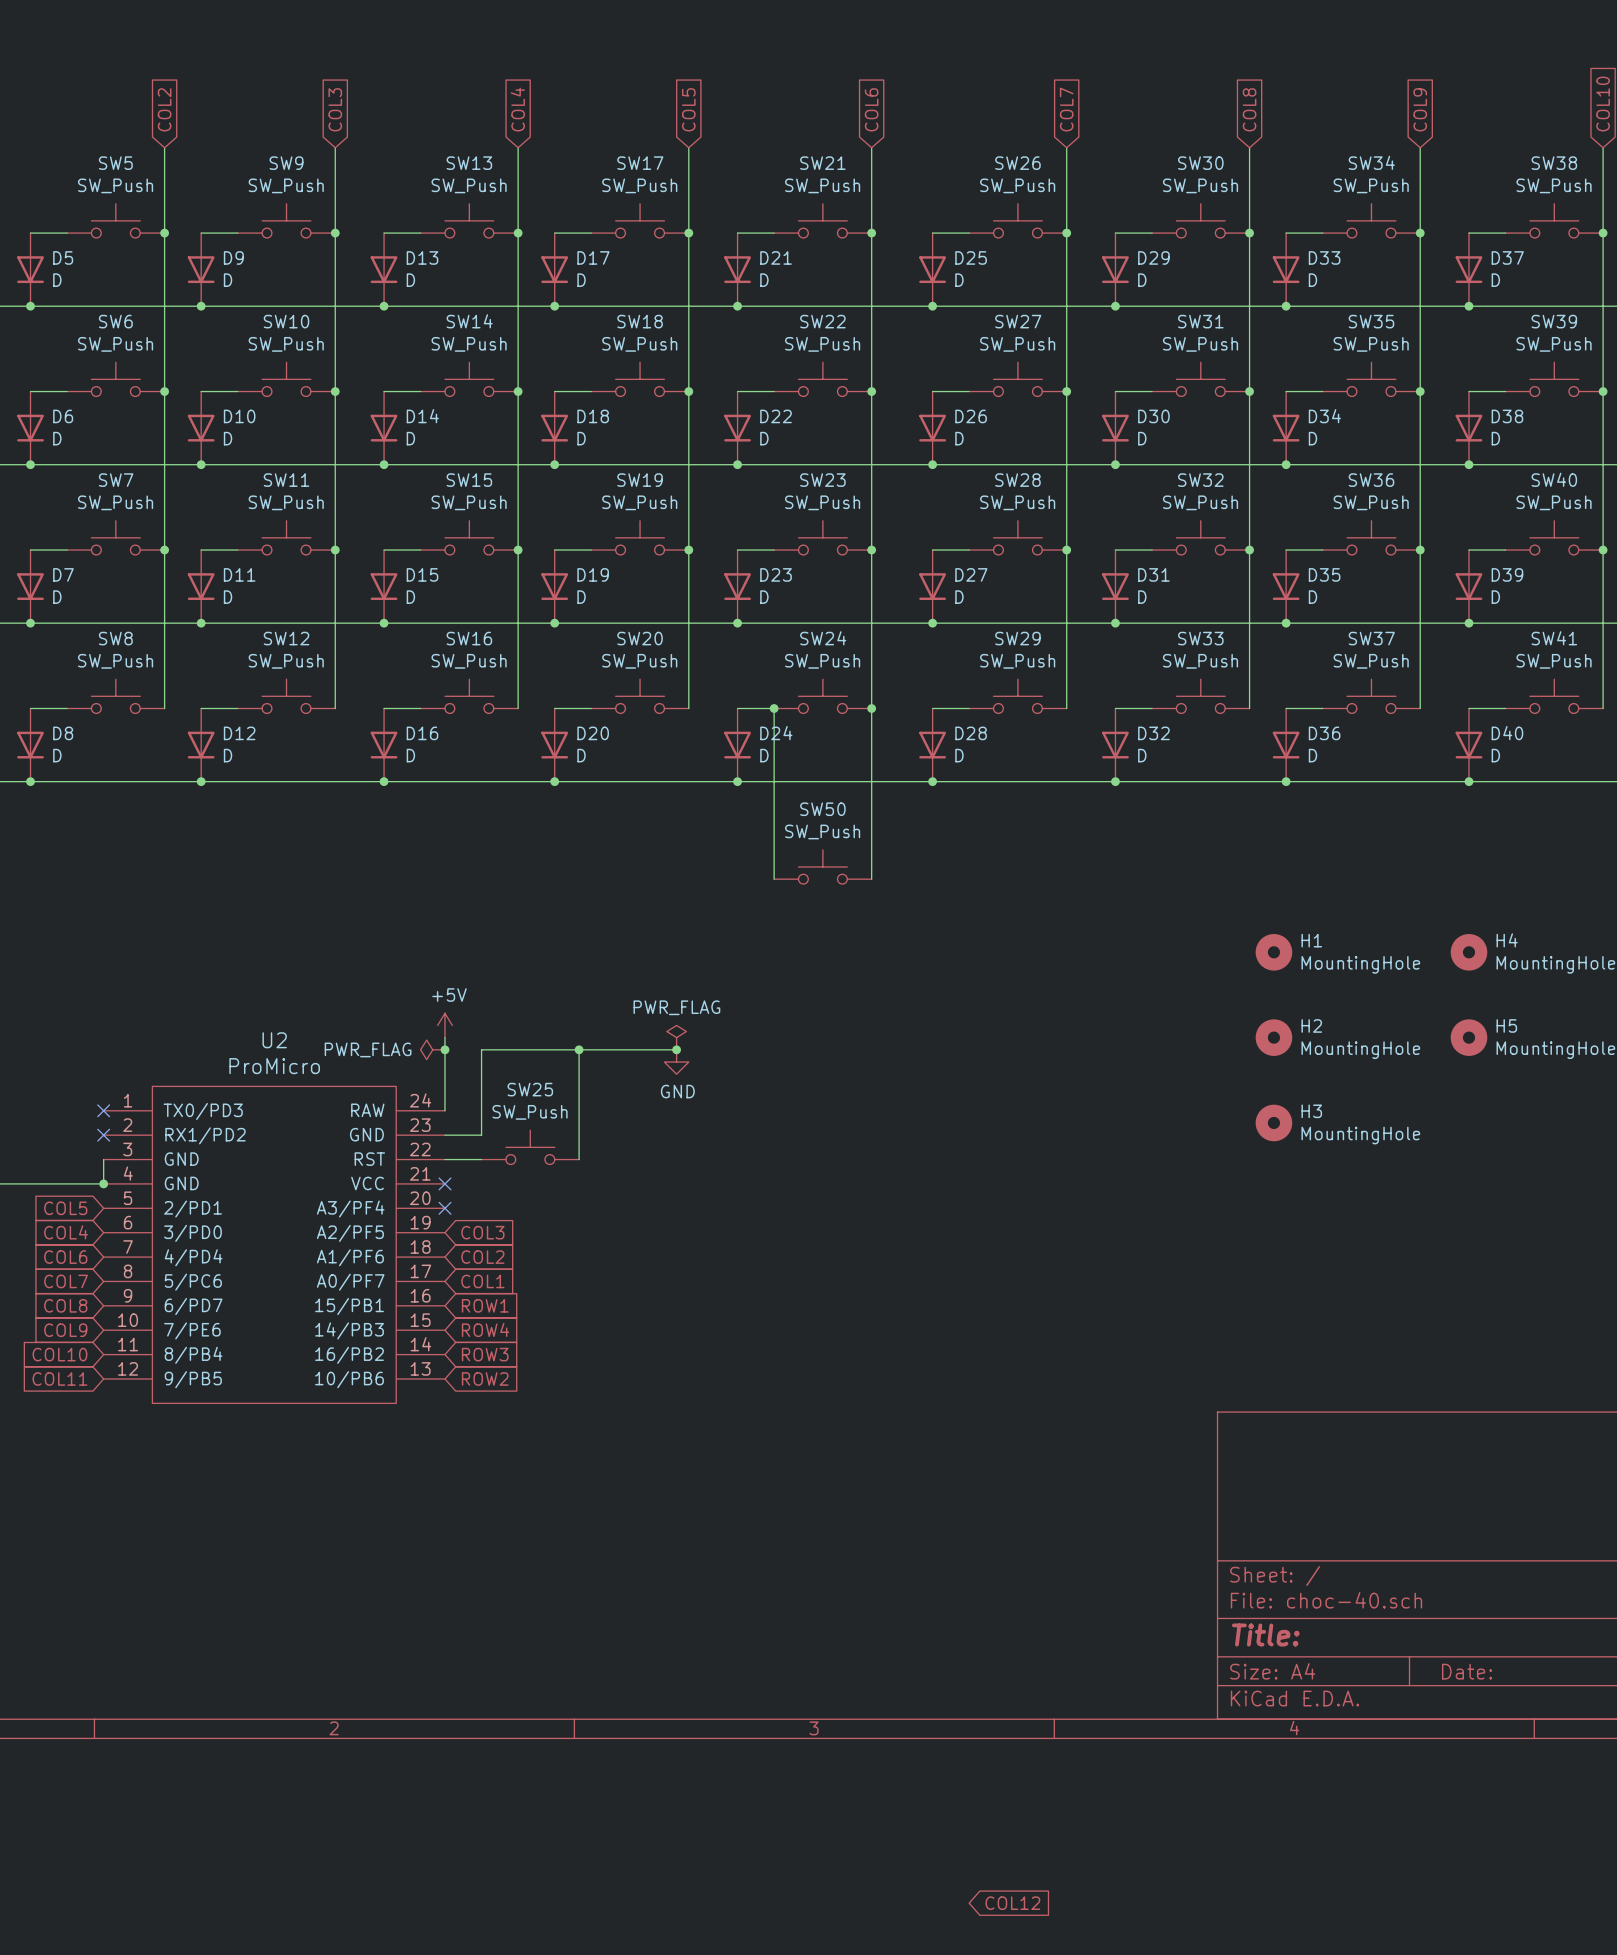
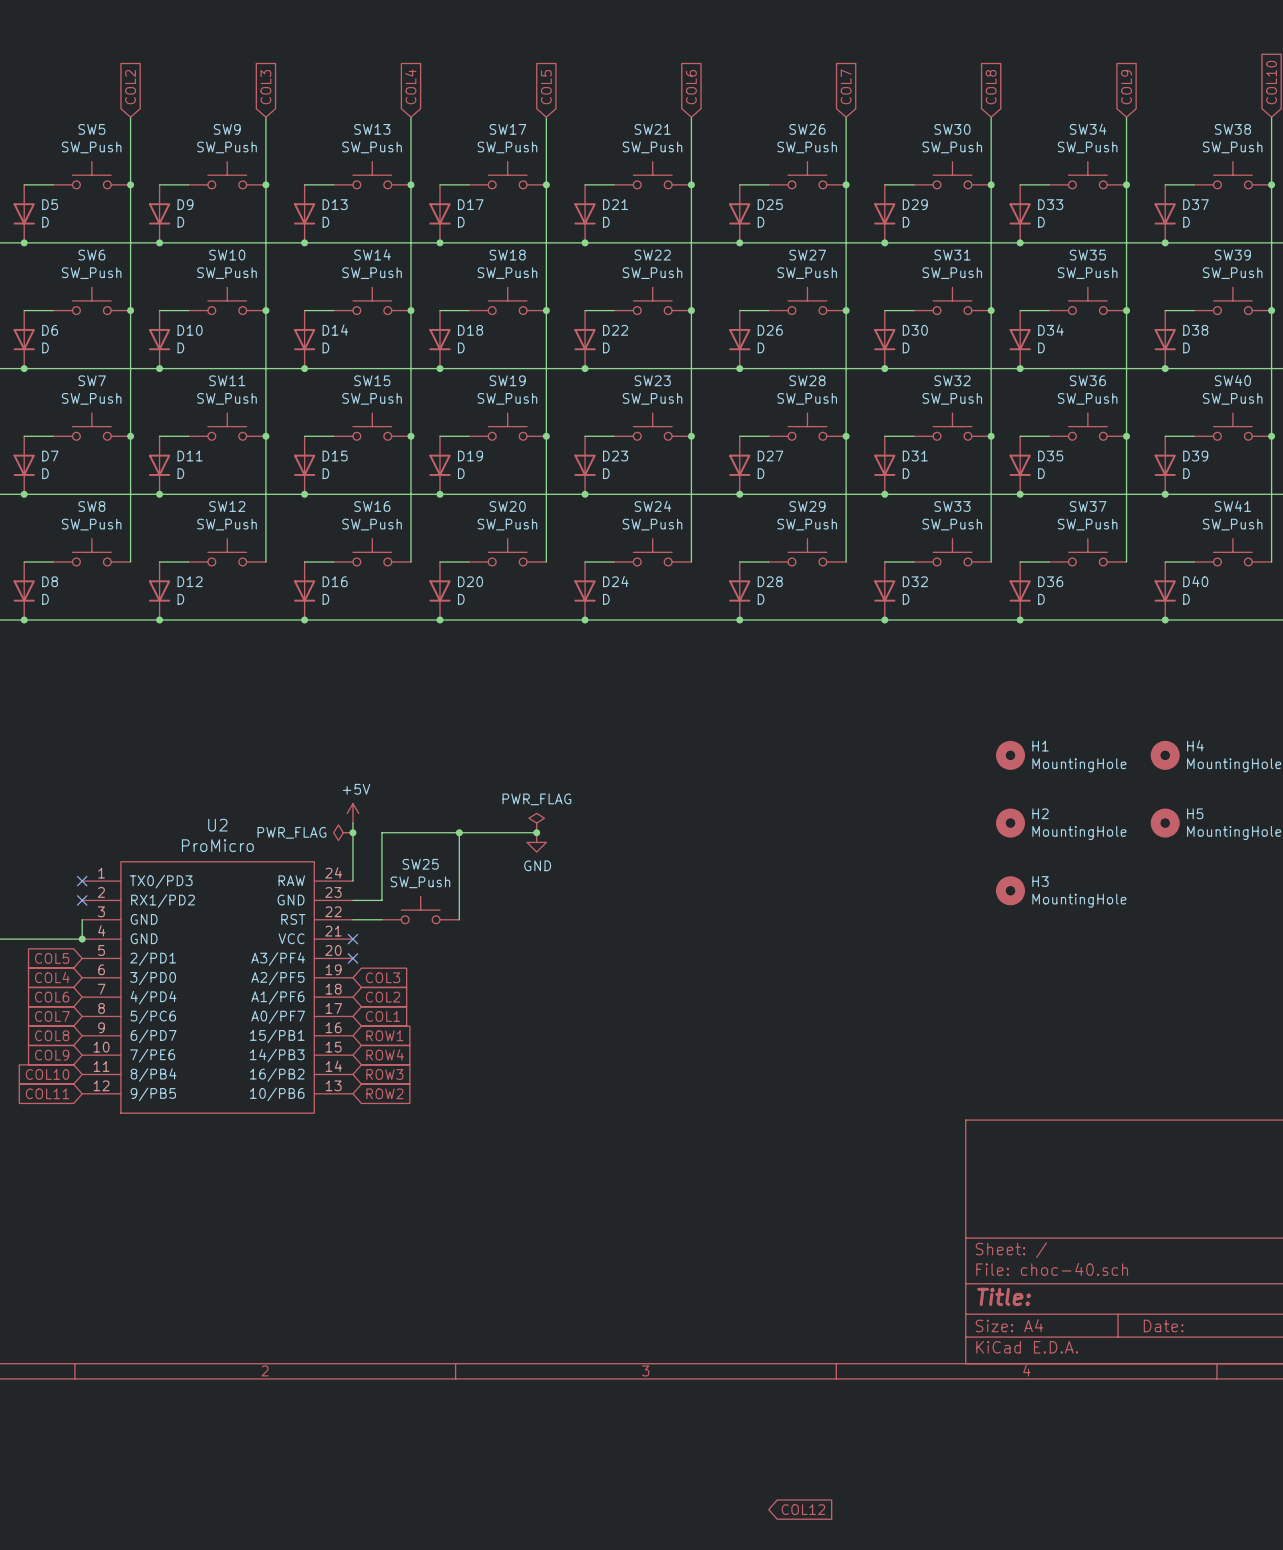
wire: (774, 708) (774, 879) -> none
junction: (774, 708) -> none
wire: (871, 708) (871, 879) -> none
junction: (871, 708) -> none
SW50: SW_Push (822, 866) -> none

